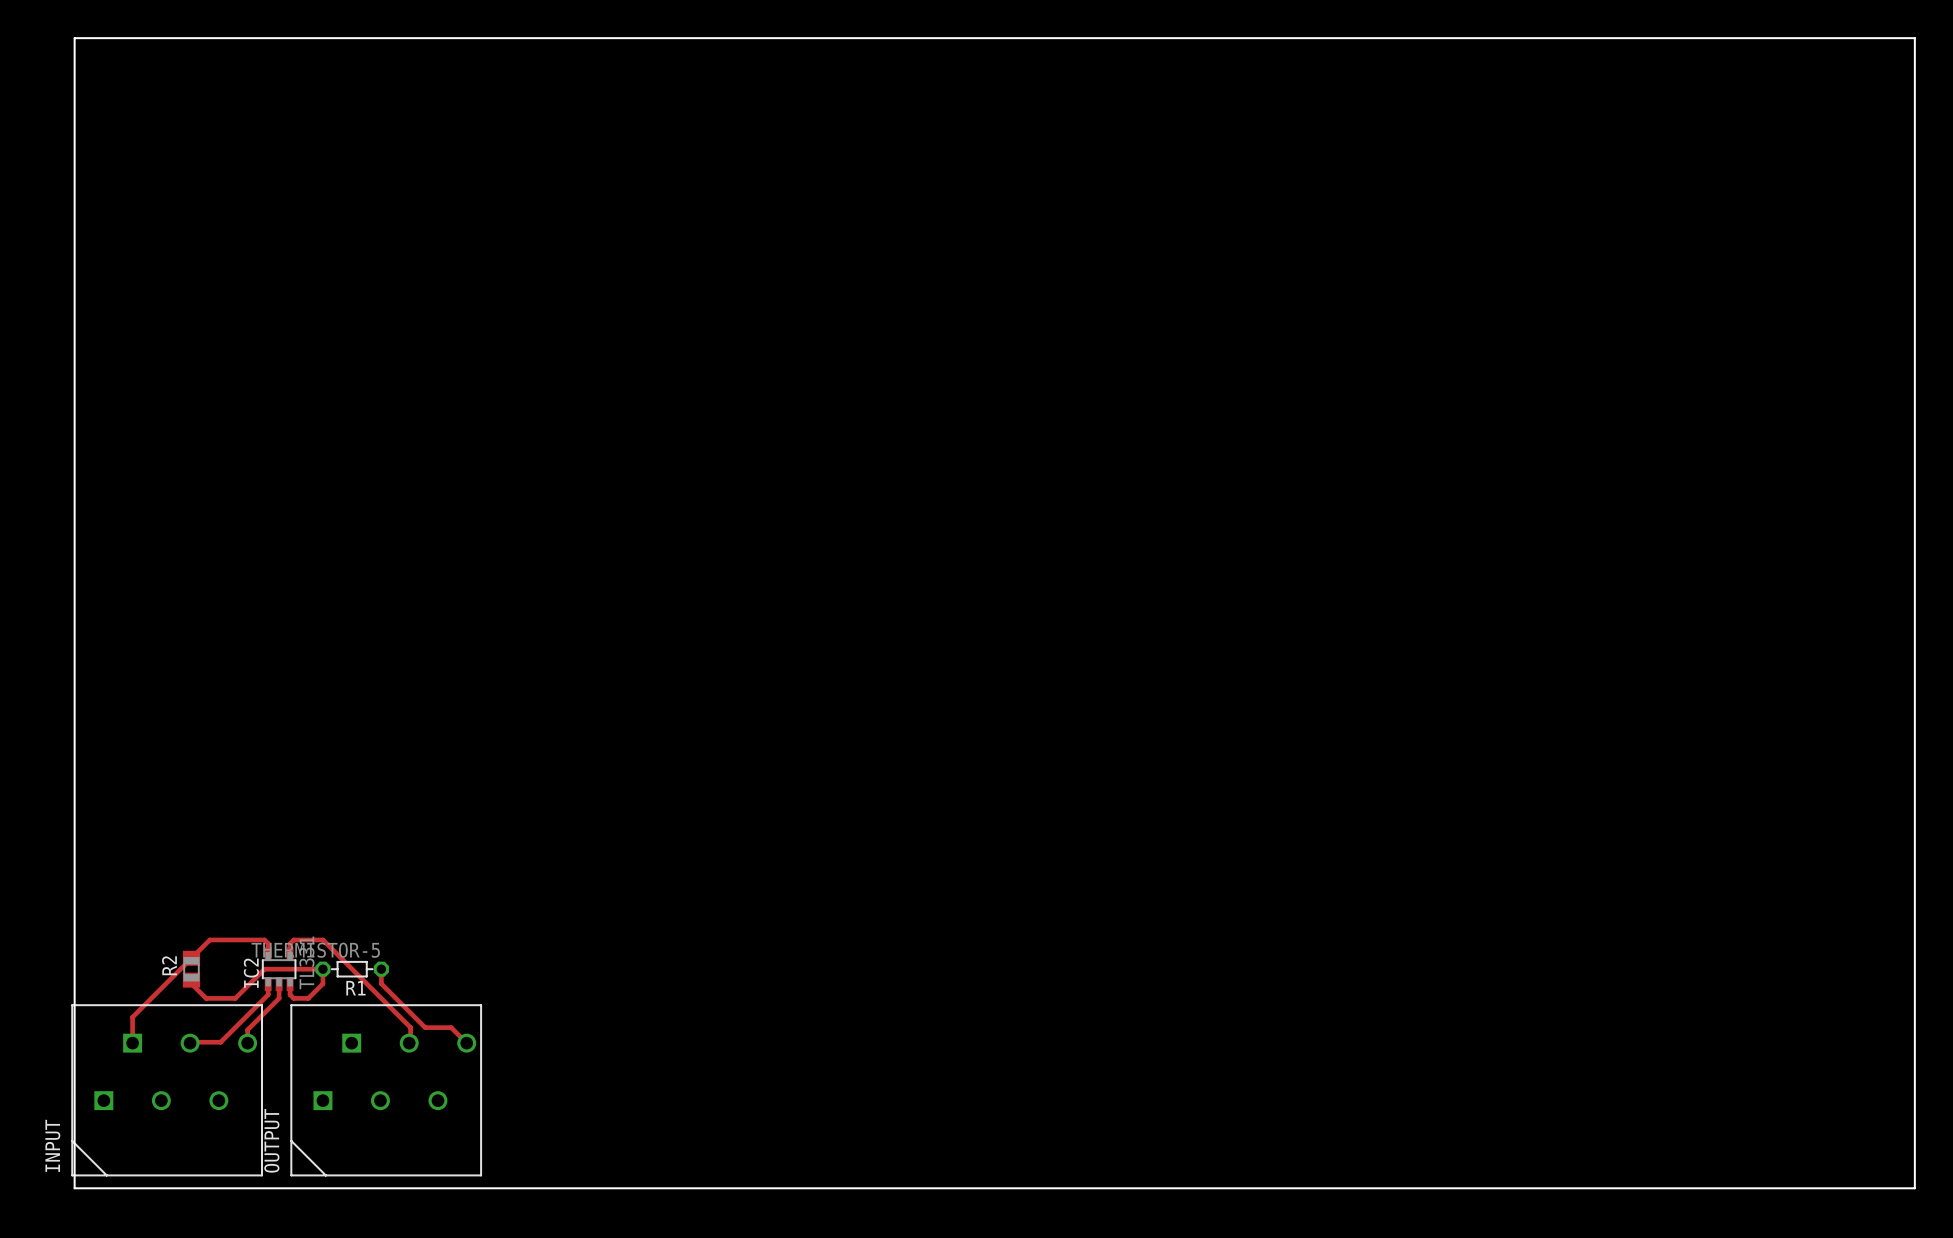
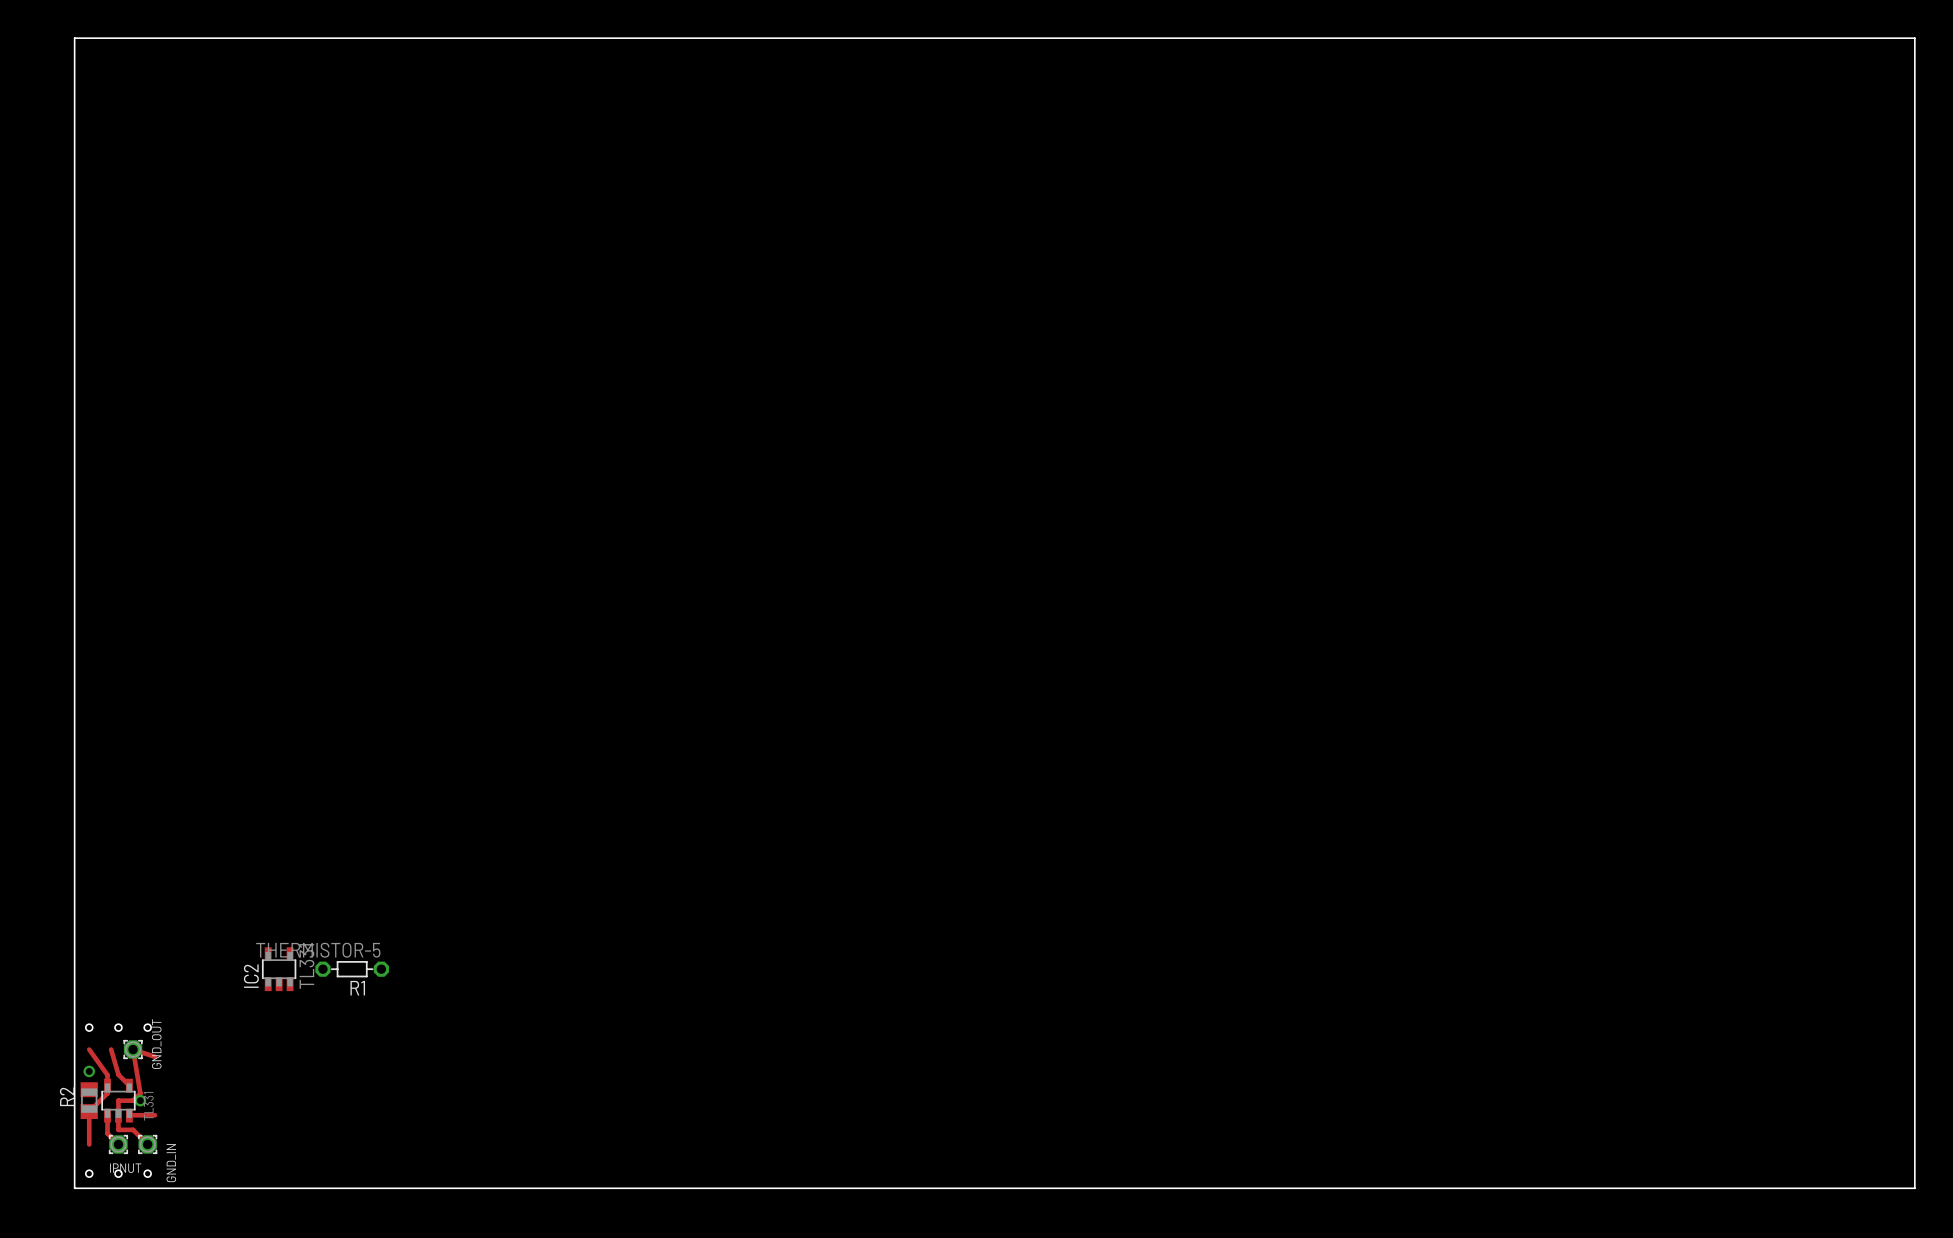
track: (268, 954) (268, 943) (264, 939) (209, 939) (132, 1017) (132, 1043) -> none
track: (290, 954) (290, 943) (293, 939) (322, 939) (410, 1027) (409, 1043) -> none
R2 position: (191, 969) -> (89, 1100)
track: (381, 969) (381, 983) (425, 1027) (451, 1027) (466, 1043) -> none
track: (191, 980) (191, 983) (206, 998) (235, 998) (264, 969) (322, 969) (322, 983) (308, 998) (293, 998) (290, 994) (290, 984) -> none
track: (268, 984) (268, 994) (220, 1042) (190, 1043) -> none
track: (279, 984) (279, 998) (247, 1029) (247, 1043) -> none
hole: none -> (89, 1027)
hole: none -> (118, 1027)
hole: none -> (147, 1027)
track: none -> (89, 1049) (107, 1075) (107, 1093) (89, 1111) (89, 1144)
track: none -> (111, 1049) (118, 1074) (129, 1085)
GND_OUT: none -> (133, 1049)
track: none -> (154, 1056) (133, 1049) (140, 1093) (133, 1100) (118, 1100) (118, 1129) (133, 1129) (147, 1144)
via: none -> (89, 1071)
INPUT: (167, 1090) -> none
OUTPUT: (386, 1090) -> none
part: none -> TL331 (118, 1100)
via: none -> (140, 1100)
track: none -> (107, 1115) (107, 1133) (118, 1144)
track: none -> (154, 1115) (129, 1115)
IPNUT: none -> (118, 1144)
GND_IN: none -> (147, 1144)
hole: none -> (89, 1173)
hole: none -> (118, 1173)
hole: none -> (147, 1173)

